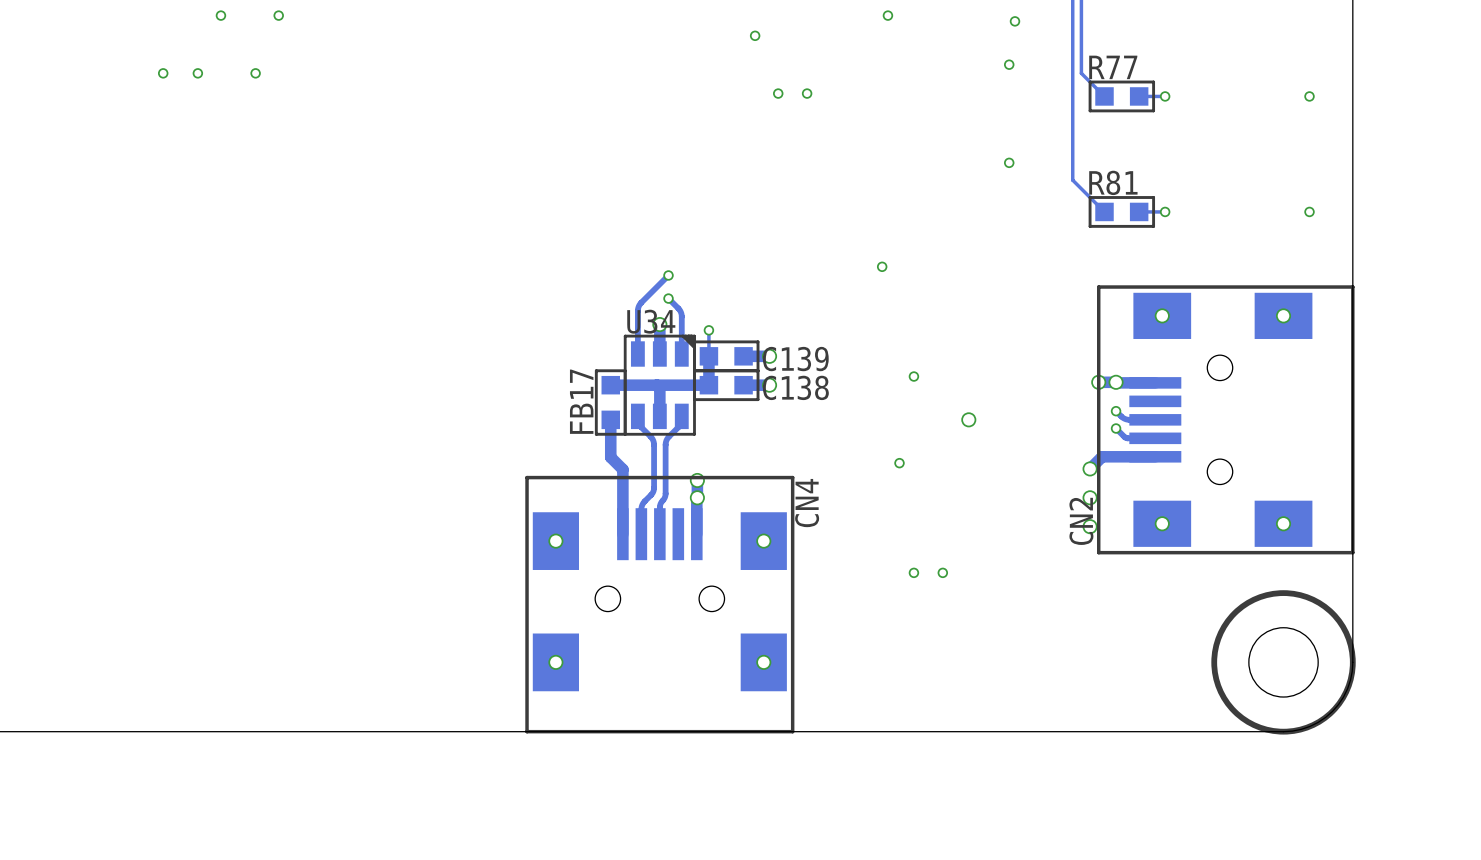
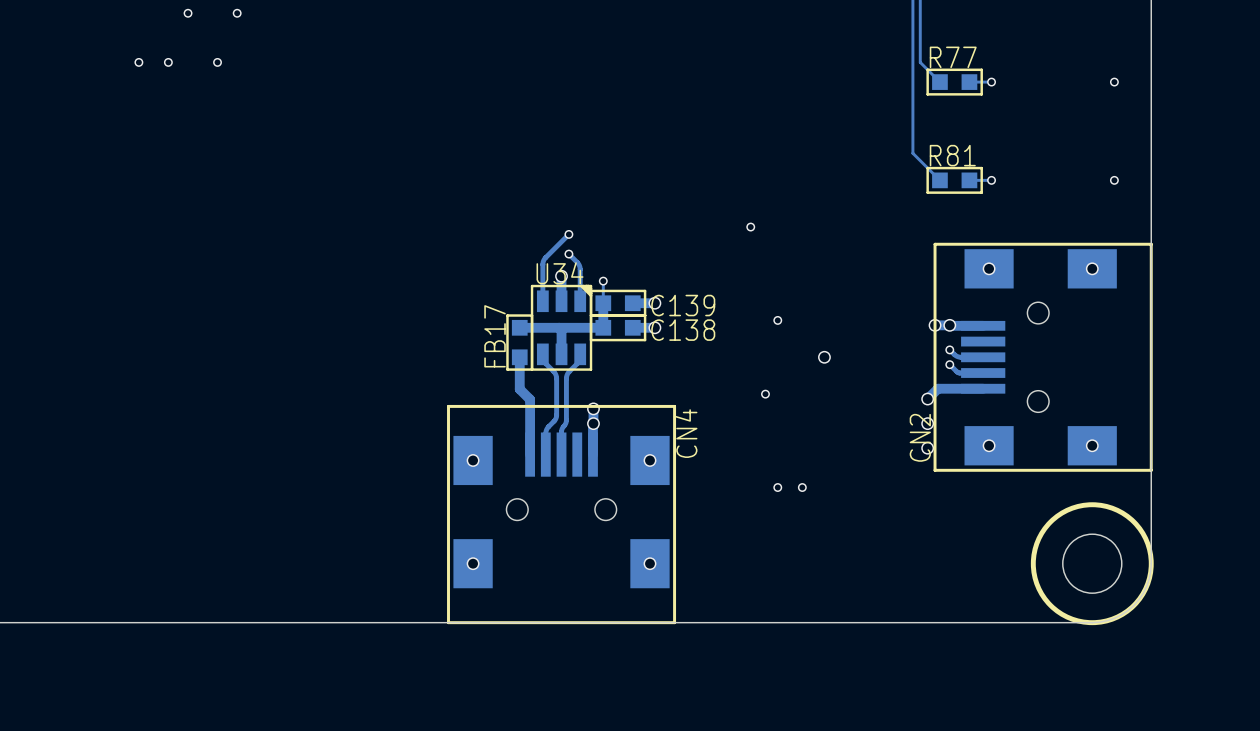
via: (887, 15) -> none
via: (1014, 21) -> none
via: (755, 35) -> none
via: (1009, 64) -> none
via: (778, 93) -> none
via: (807, 93) -> none
via: (1009, 162) -> none

